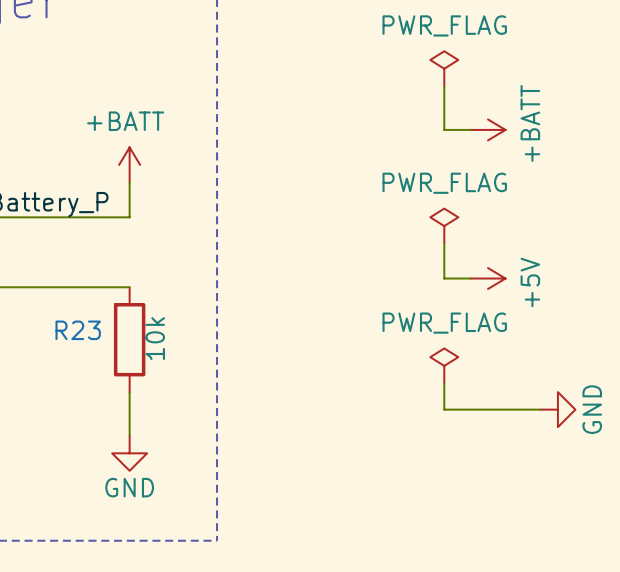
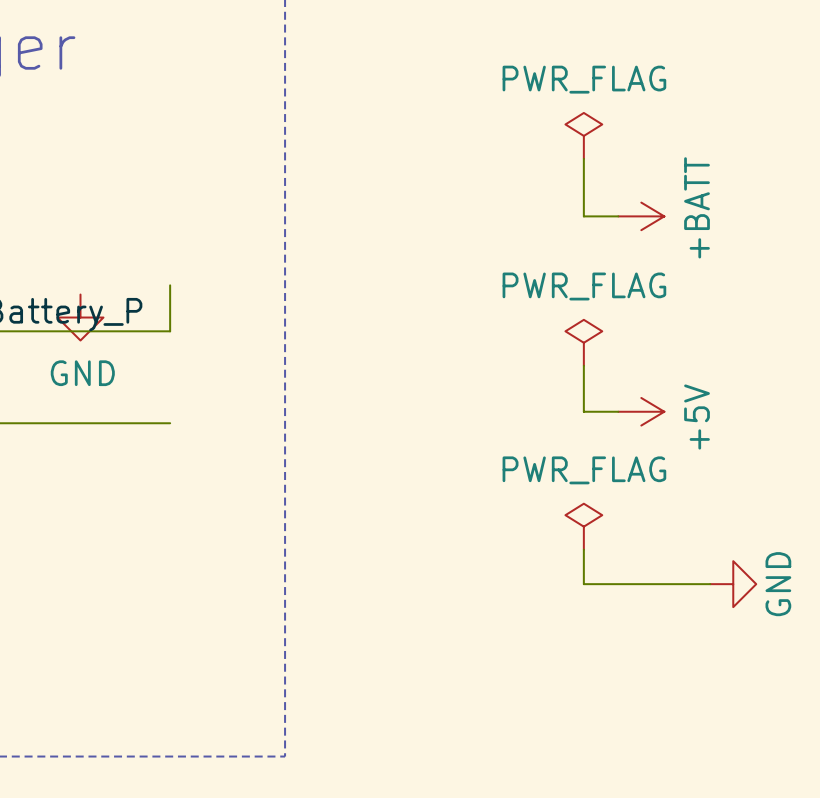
power symbol: +BATT (129, 164) -> none
R23: 10k (129, 339) -> none
wire: (129, 392) (129, 435) -> none
power symbol position: GND (129, 453) -> GND (80, 317)
power symbol text position: GND (129, 487) -> GND (82, 373)

